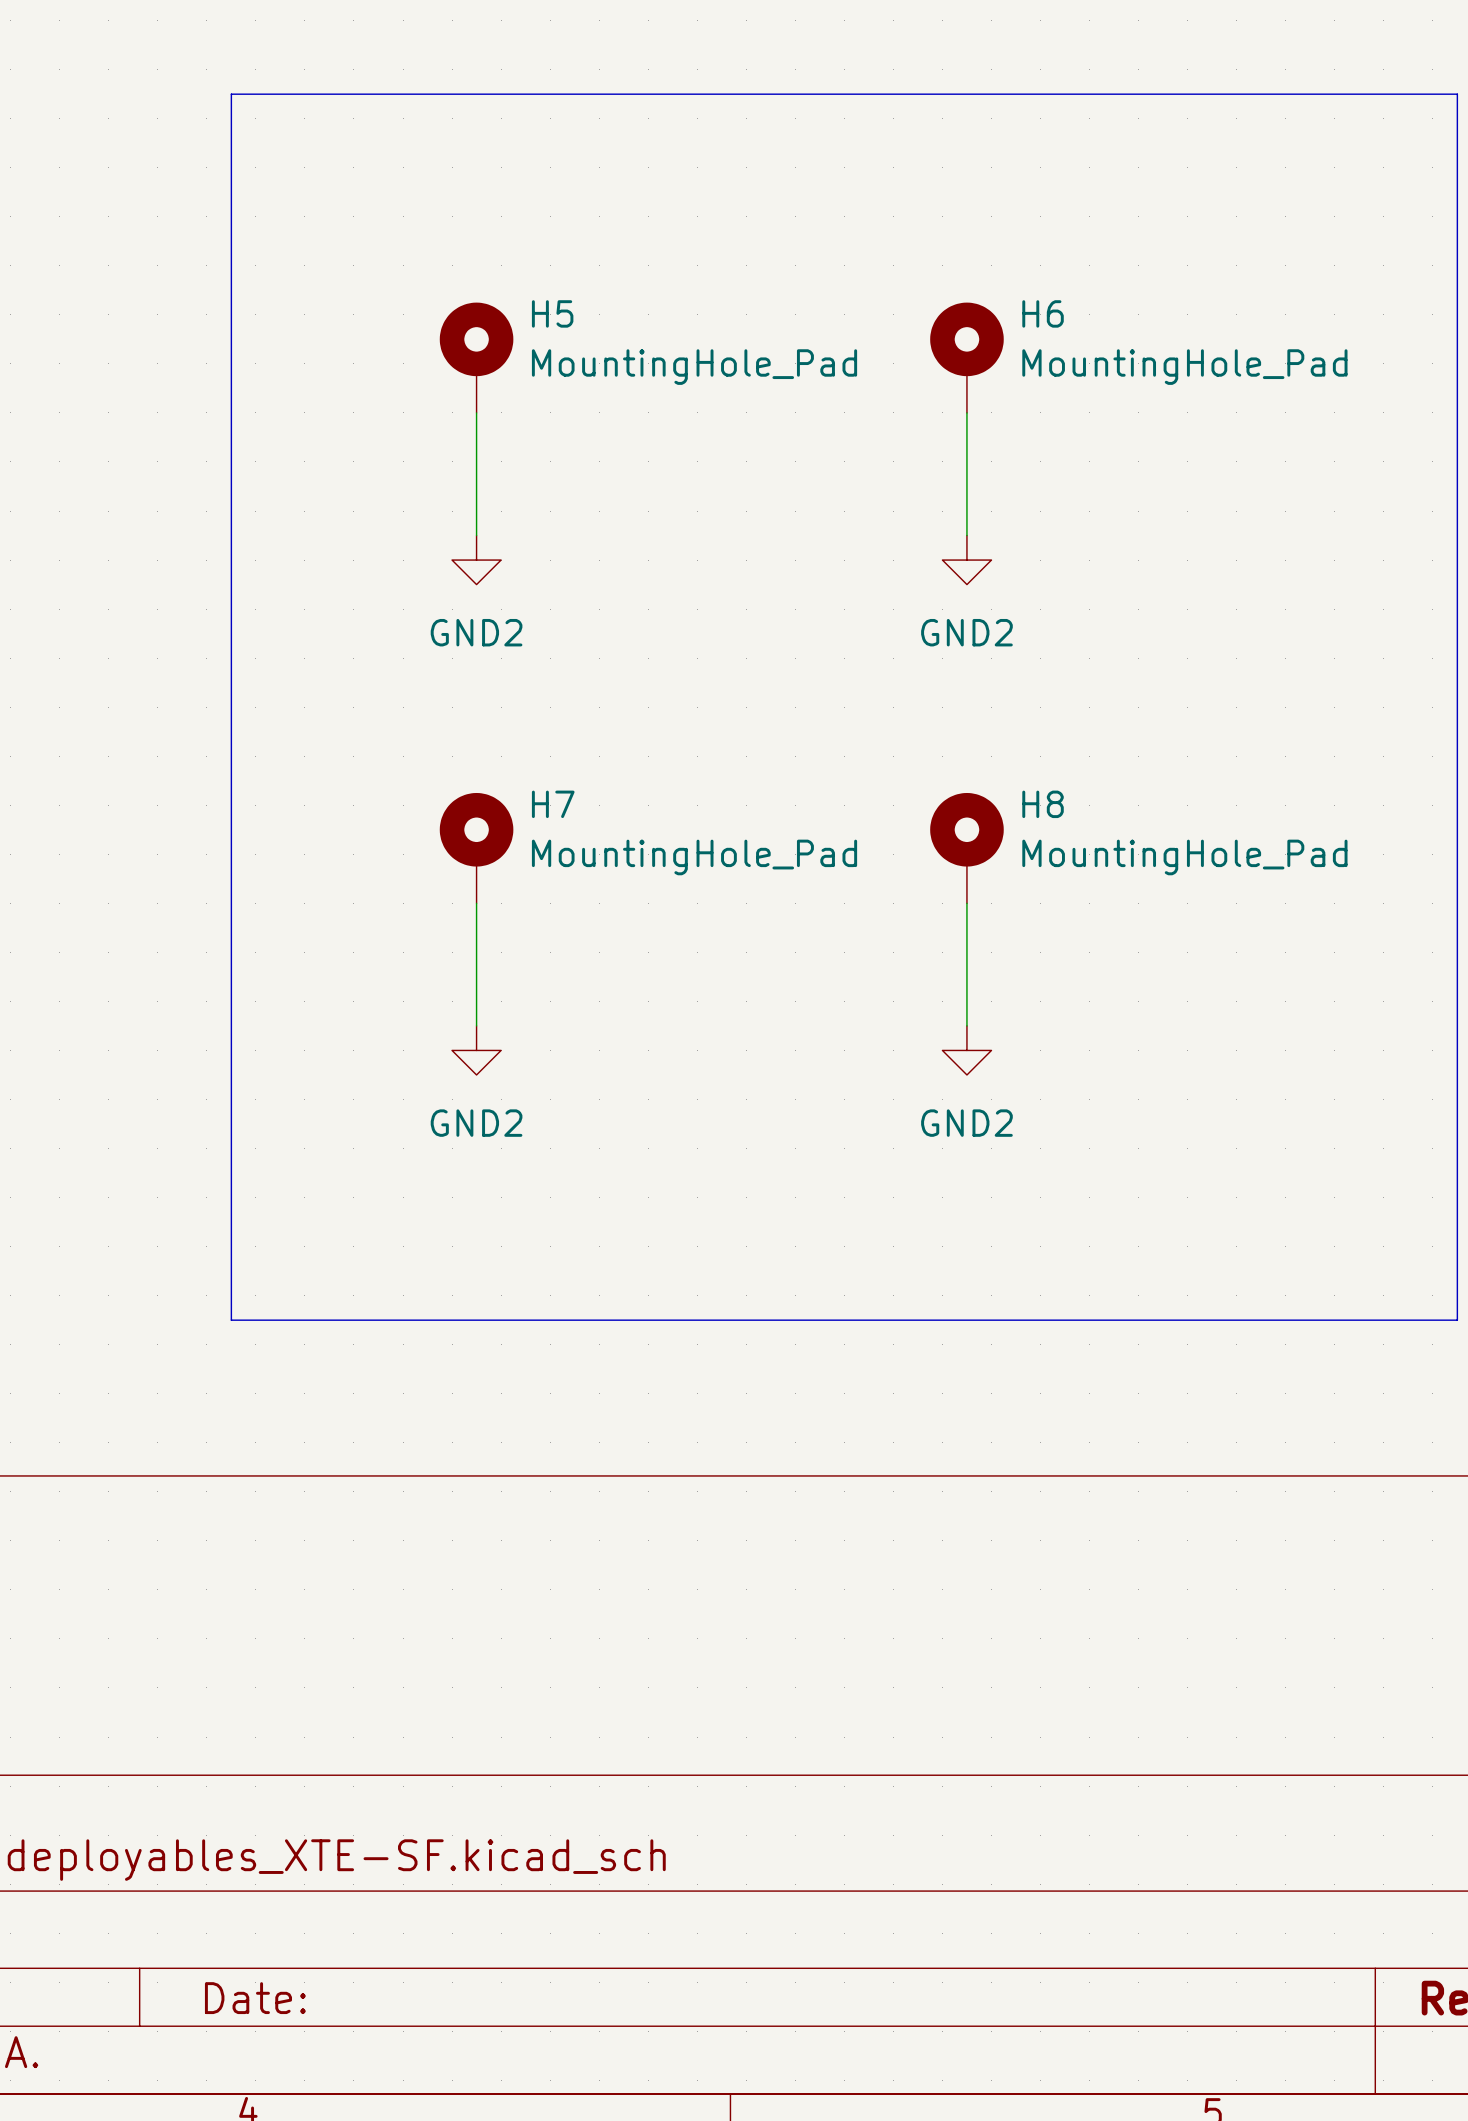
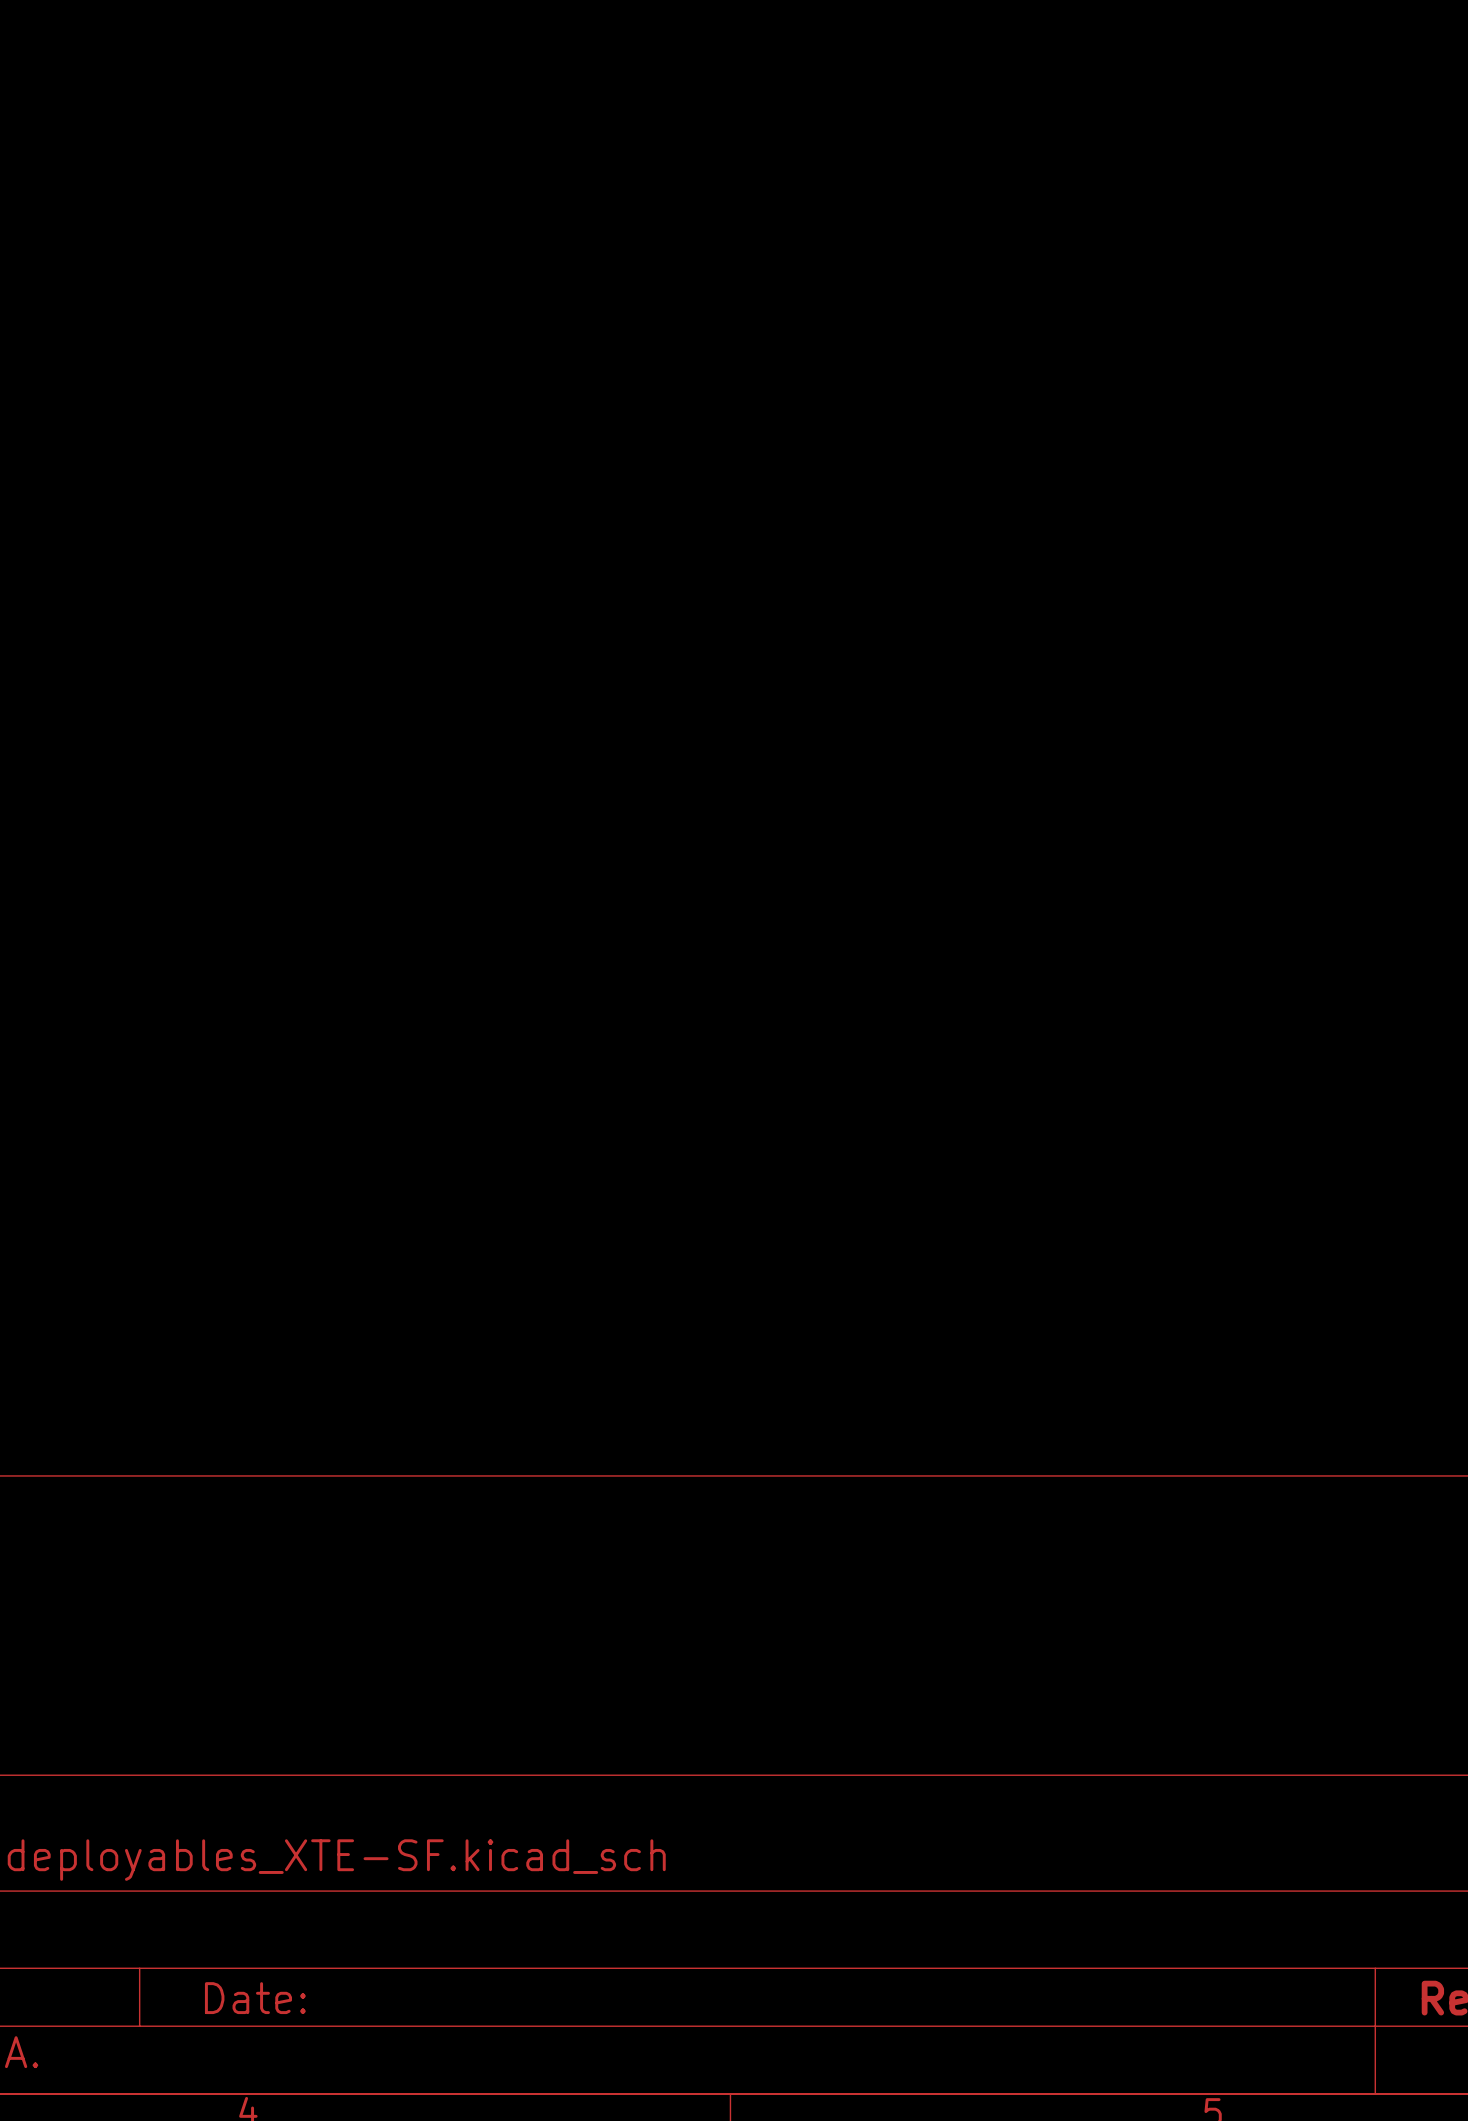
line: (231, 94) (1457, 94) (1457, 1320) (231, 1320) (231, 94) -> none
H5: MountingHole_Pad (476, 357) -> none
H6: MountingHole_Pad (966, 357) -> none
wire: (476, 412) (476, 535) -> none
wire: (966, 412) (966, 535) -> none
power symbol: GND2 (476, 560) -> none
power symbol: GND2 (966, 560) -> none
H7: MountingHole_Pad (476, 848) -> none
H8: MountingHole_Pad (966, 848) -> none
wire: (476, 903) (476, 1025) -> none
wire: (966, 903) (966, 1025) -> none
power symbol: GND2 (476, 1050) -> none
power symbol: GND2 (966, 1050) -> none

